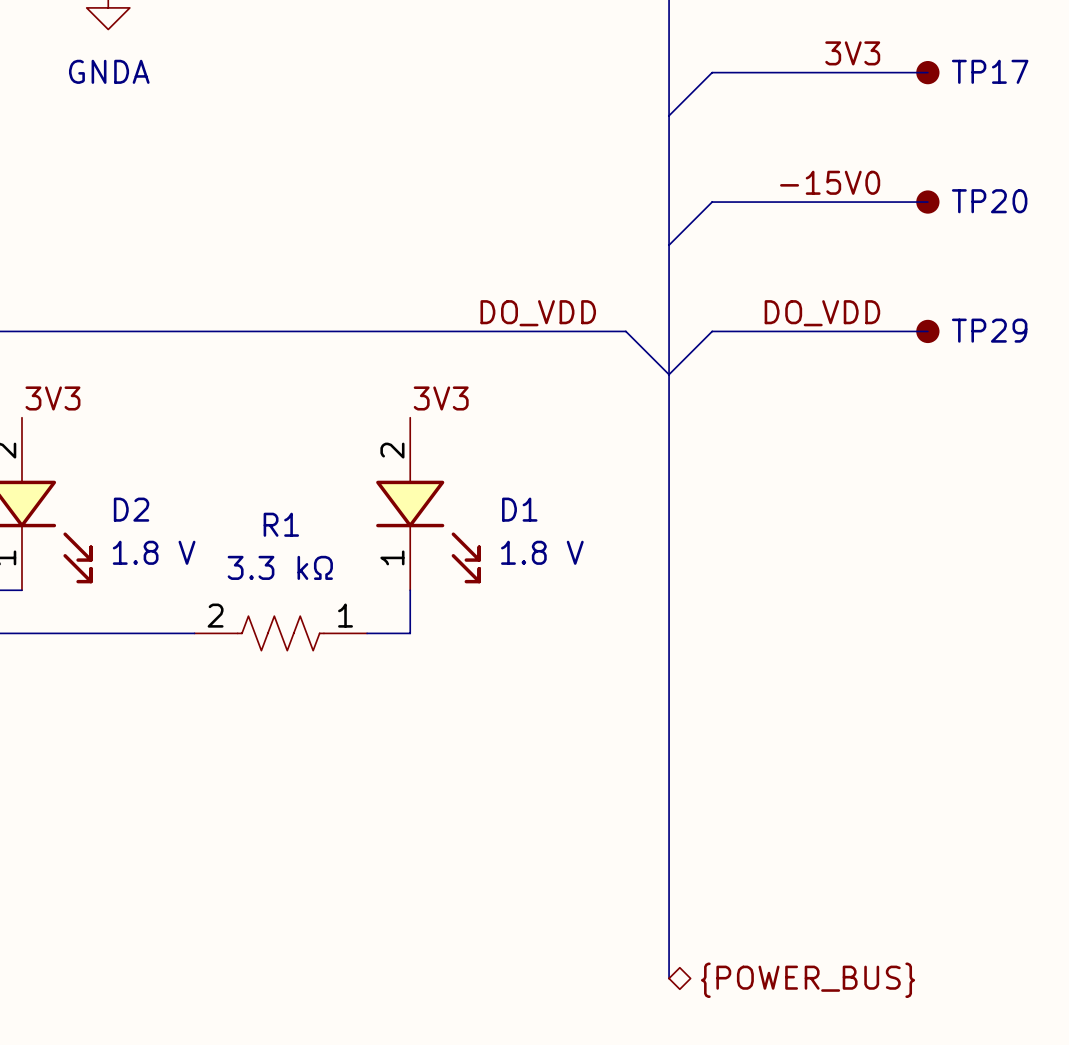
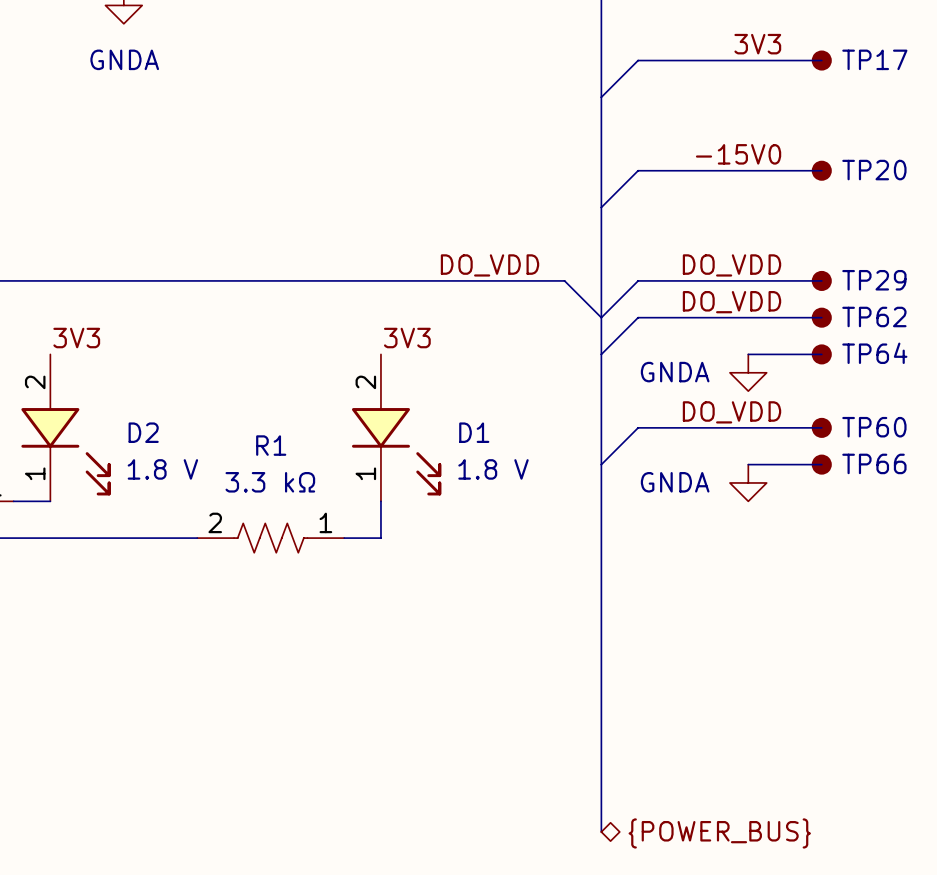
label: none -> DO_VDD (732, 302)
wire: none -> (821, 317) (638, 317) (601, 354)
TP62: none -> (821, 317)
wire: none -> (748, 354) (821, 354)
TP64: none -> (821, 354)
power symbol: none -> GNDA (748, 372)
label: none -> DO_VDD (732, 412)
wire: none -> (821, 427) (638, 427) (601, 464)
TP60: none -> (821, 427)
wire: none -> (748, 464) (821, 464)
TP66: none -> (821, 464)
power symbol: none -> GNDA (748, 482)

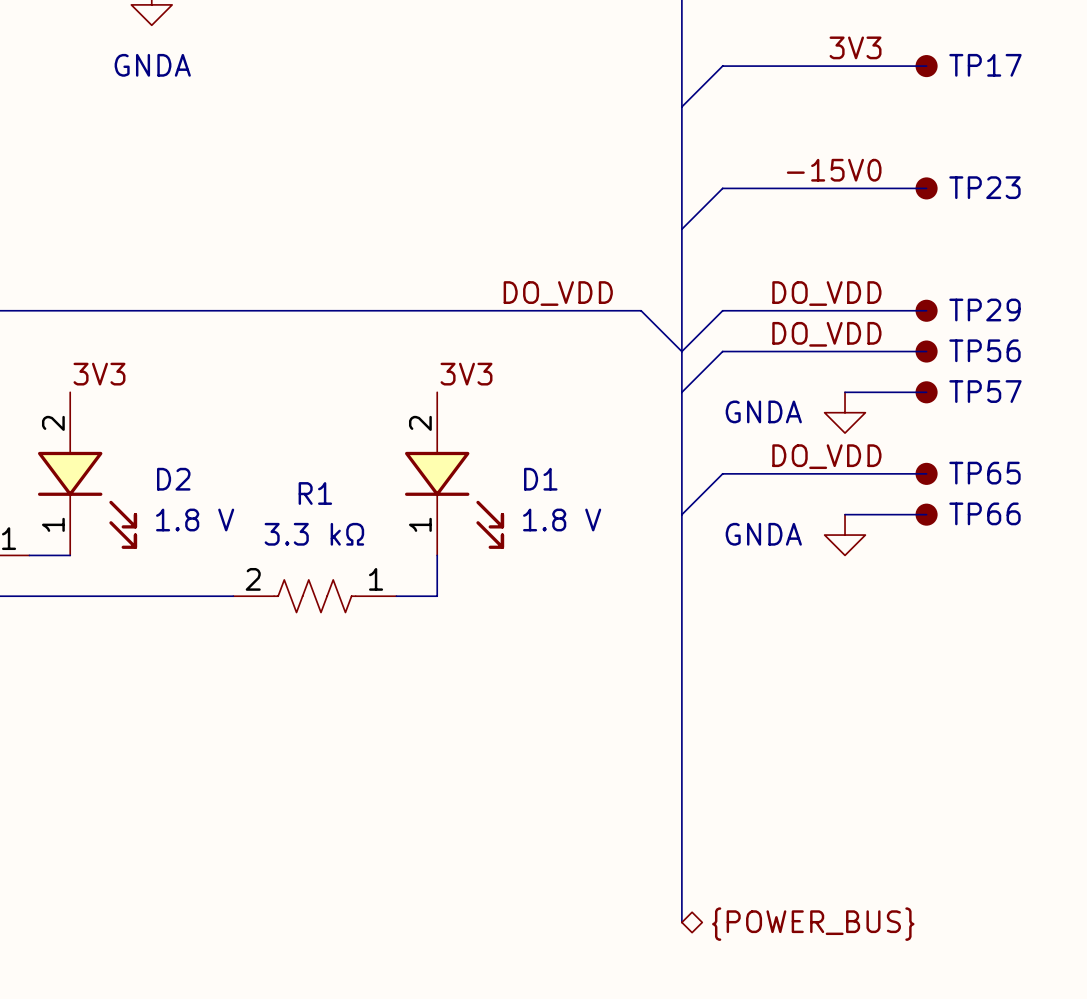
TP20 name: TP20 (874, 170) -> TP23 (984, 187)
TP62 name: TP62 (874, 316) -> TP56 (984, 350)
TP64 name: TP64 (874, 353) -> TP57 (985, 391)
TP60 name: TP60 (874, 427) -> TP65 (984, 473)

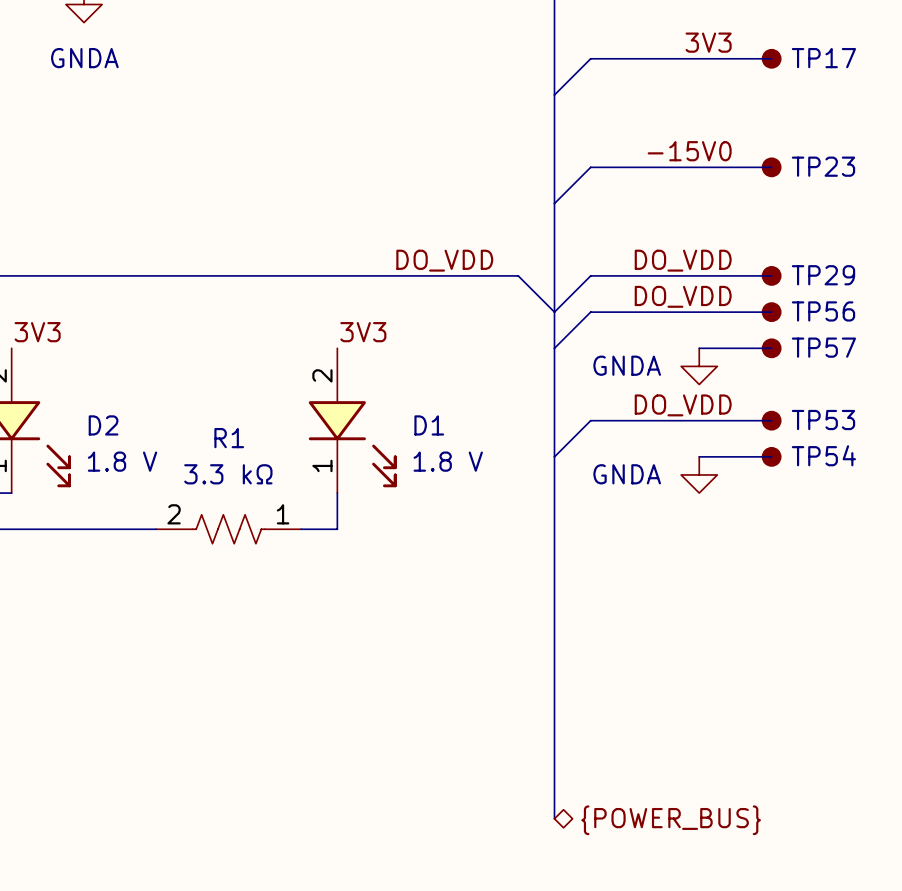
TP65 name: TP65 (984, 473) -> TP53 (823, 420)
TP66 name: TP66 (984, 513) -> TP54 (823, 455)

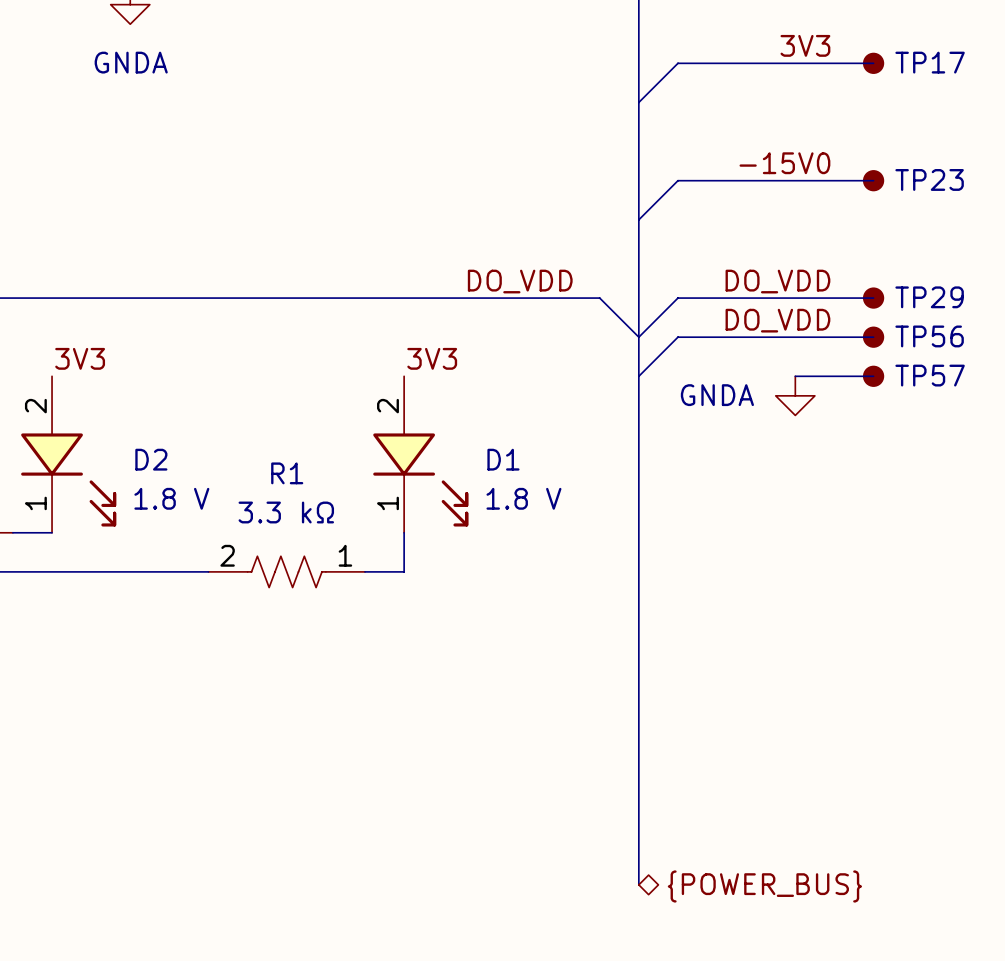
label: DO_VDD (683, 405) -> none
wire: (771, 420) (590, 420) (554, 456) -> none
TP53: (771, 420) -> none
wire: (699, 456) (771, 456) -> none
TP54: (771, 456) -> none
power symbol: GNDA (699, 474) -> none

